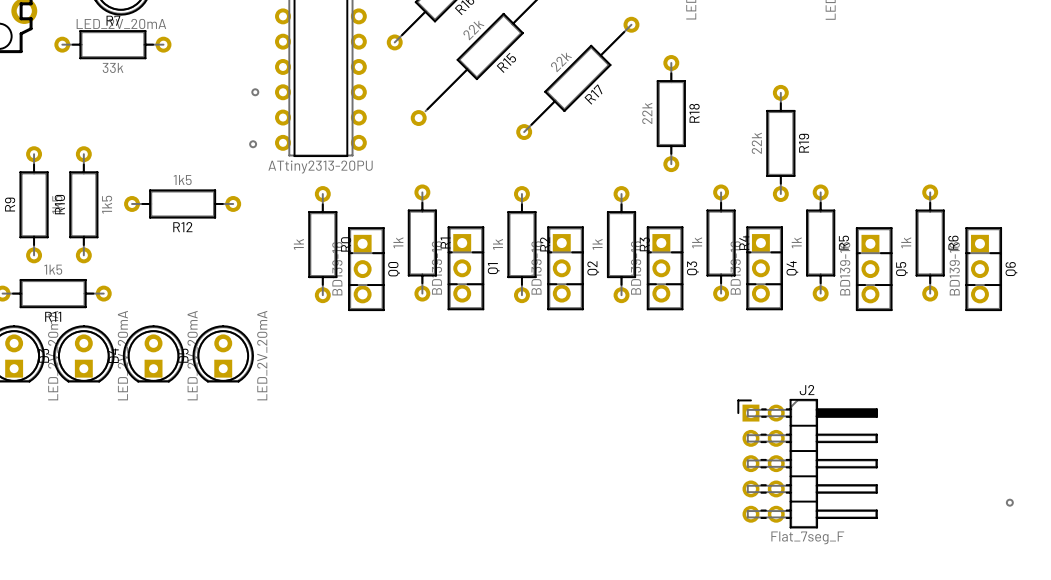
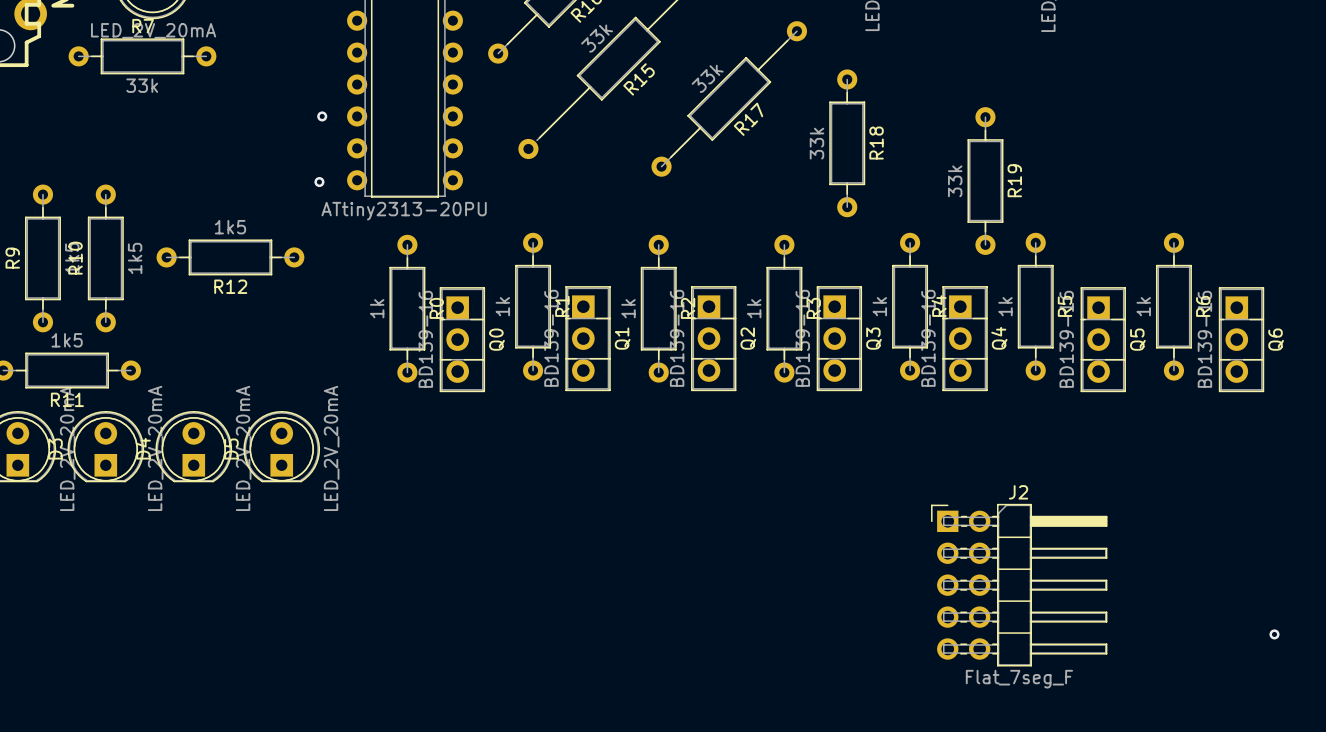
R15 value: 22k (473, 30) -> 33k (597, 38)
R17 value: 22k (561, 62) -> 33k (707, 78)
R18 value: 22k (647, 113) -> 33k (816, 143)
R19 value: 22k (756, 143) -> 33k (955, 181)

